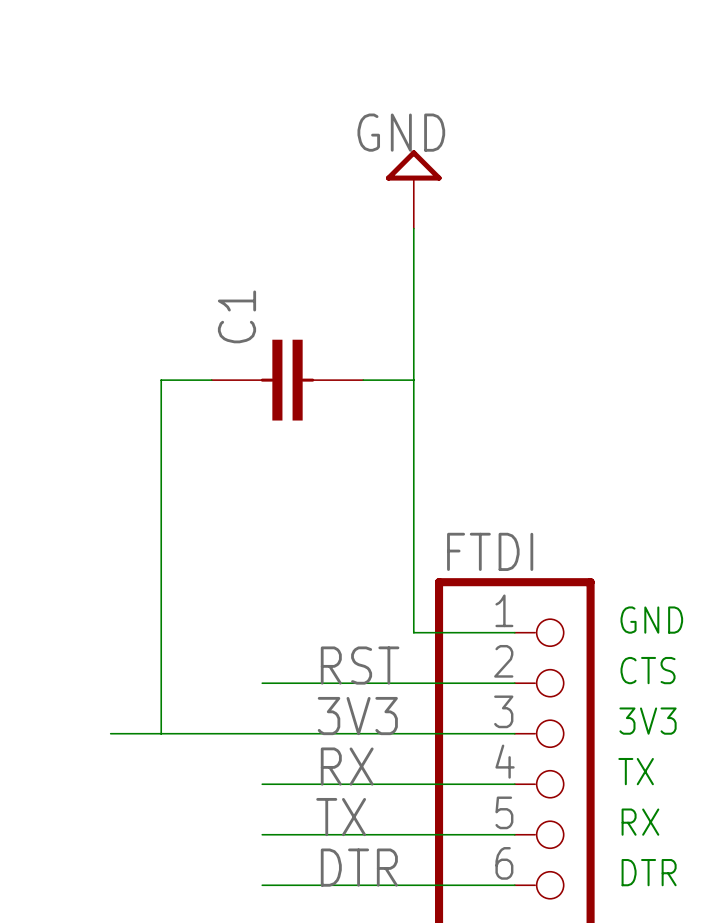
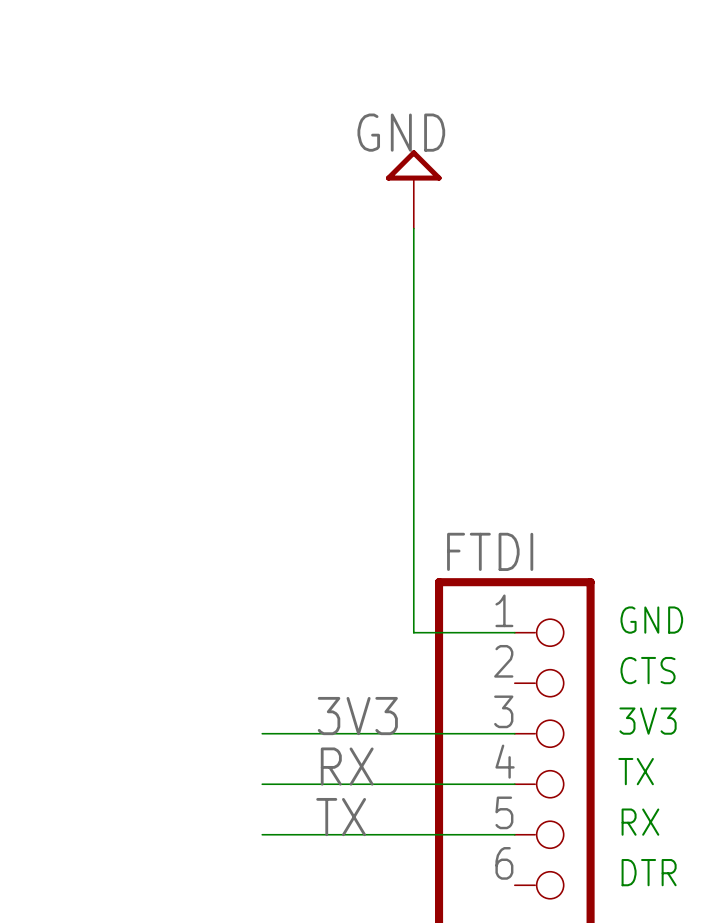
wire: (211, 380) (161, 380) (161, 733) -> none
C1: (287, 380) -> none
wire: (363, 380) (413, 380) -> none
label: RST (360, 665) -> none
wire: (262, 683) (514, 683) -> none
wire: (110, 733) (262, 733) -> none
label: DTR (359, 867) -> none
wire: (262, 885) (514, 885) -> none

